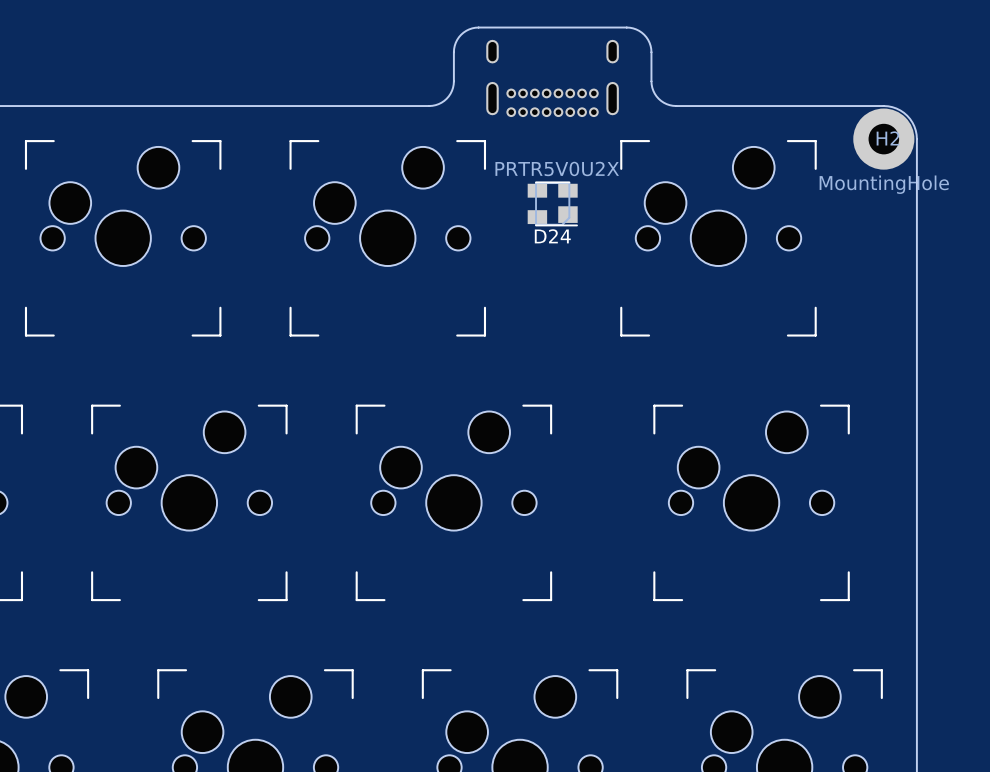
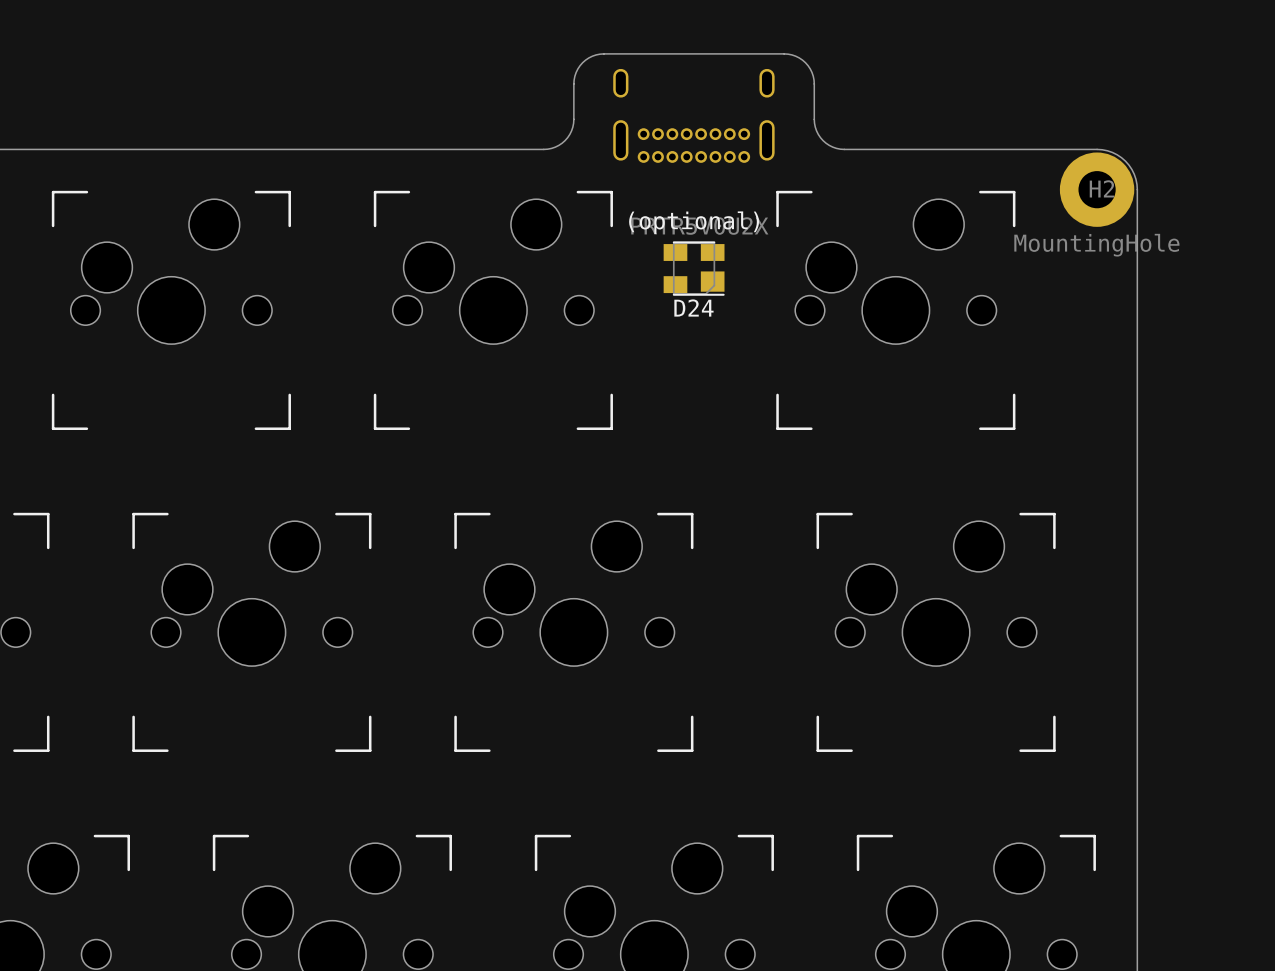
text: none -> (optional) (694, 222)

